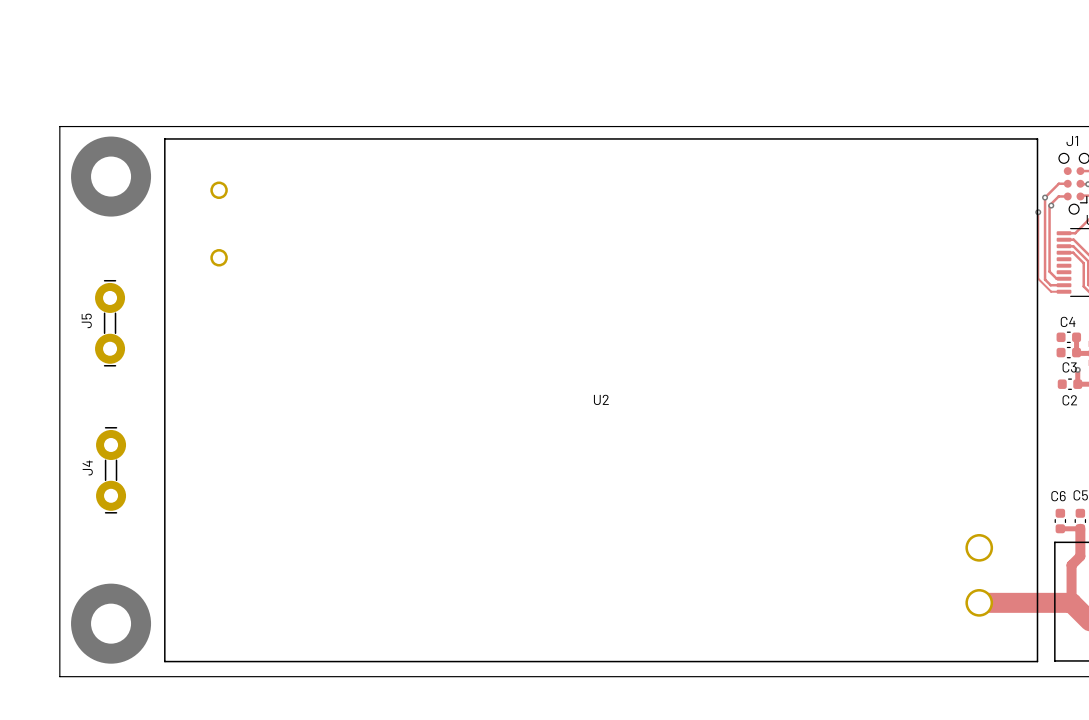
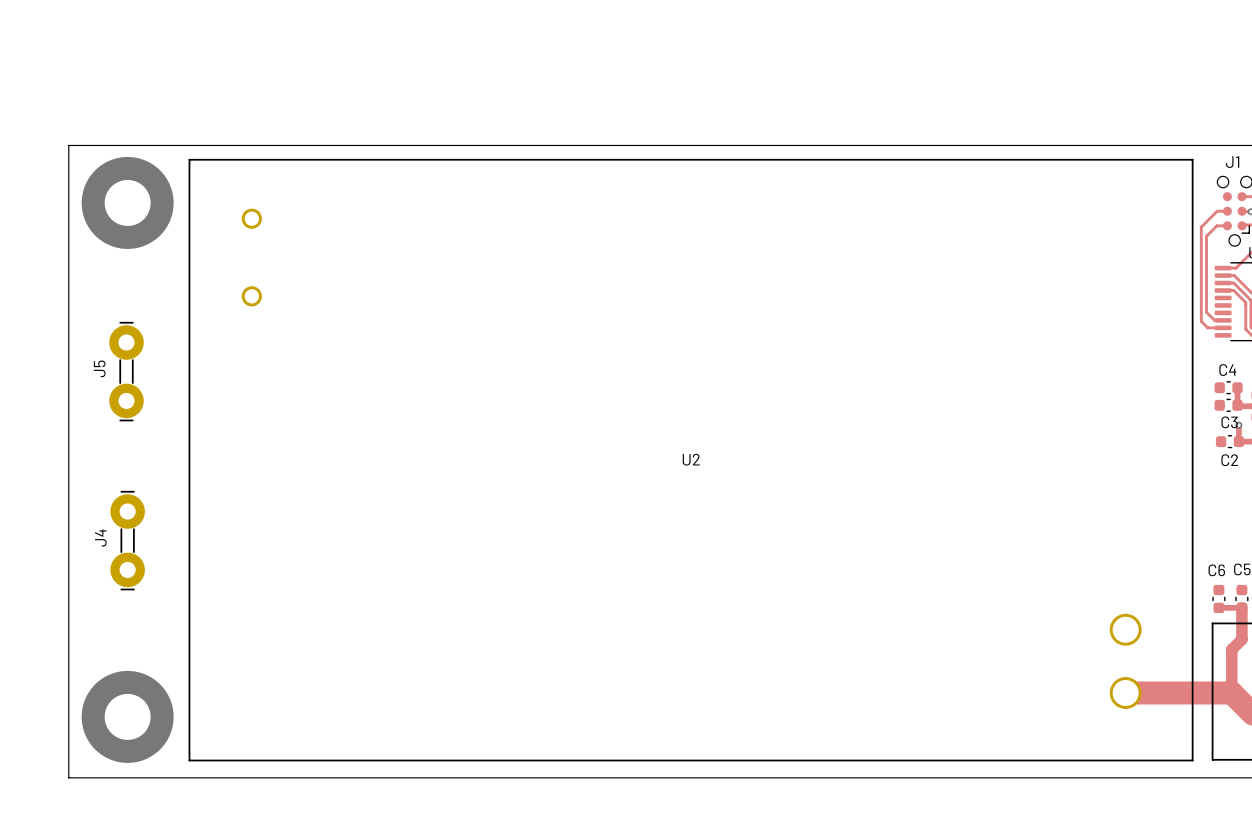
via: (1045, 197) -> none
via: (1051, 205) -> none
track: (1038, 212) (1038, 278) (1051, 291) (1064, 291) -> none
via: (1038, 212) -> none

